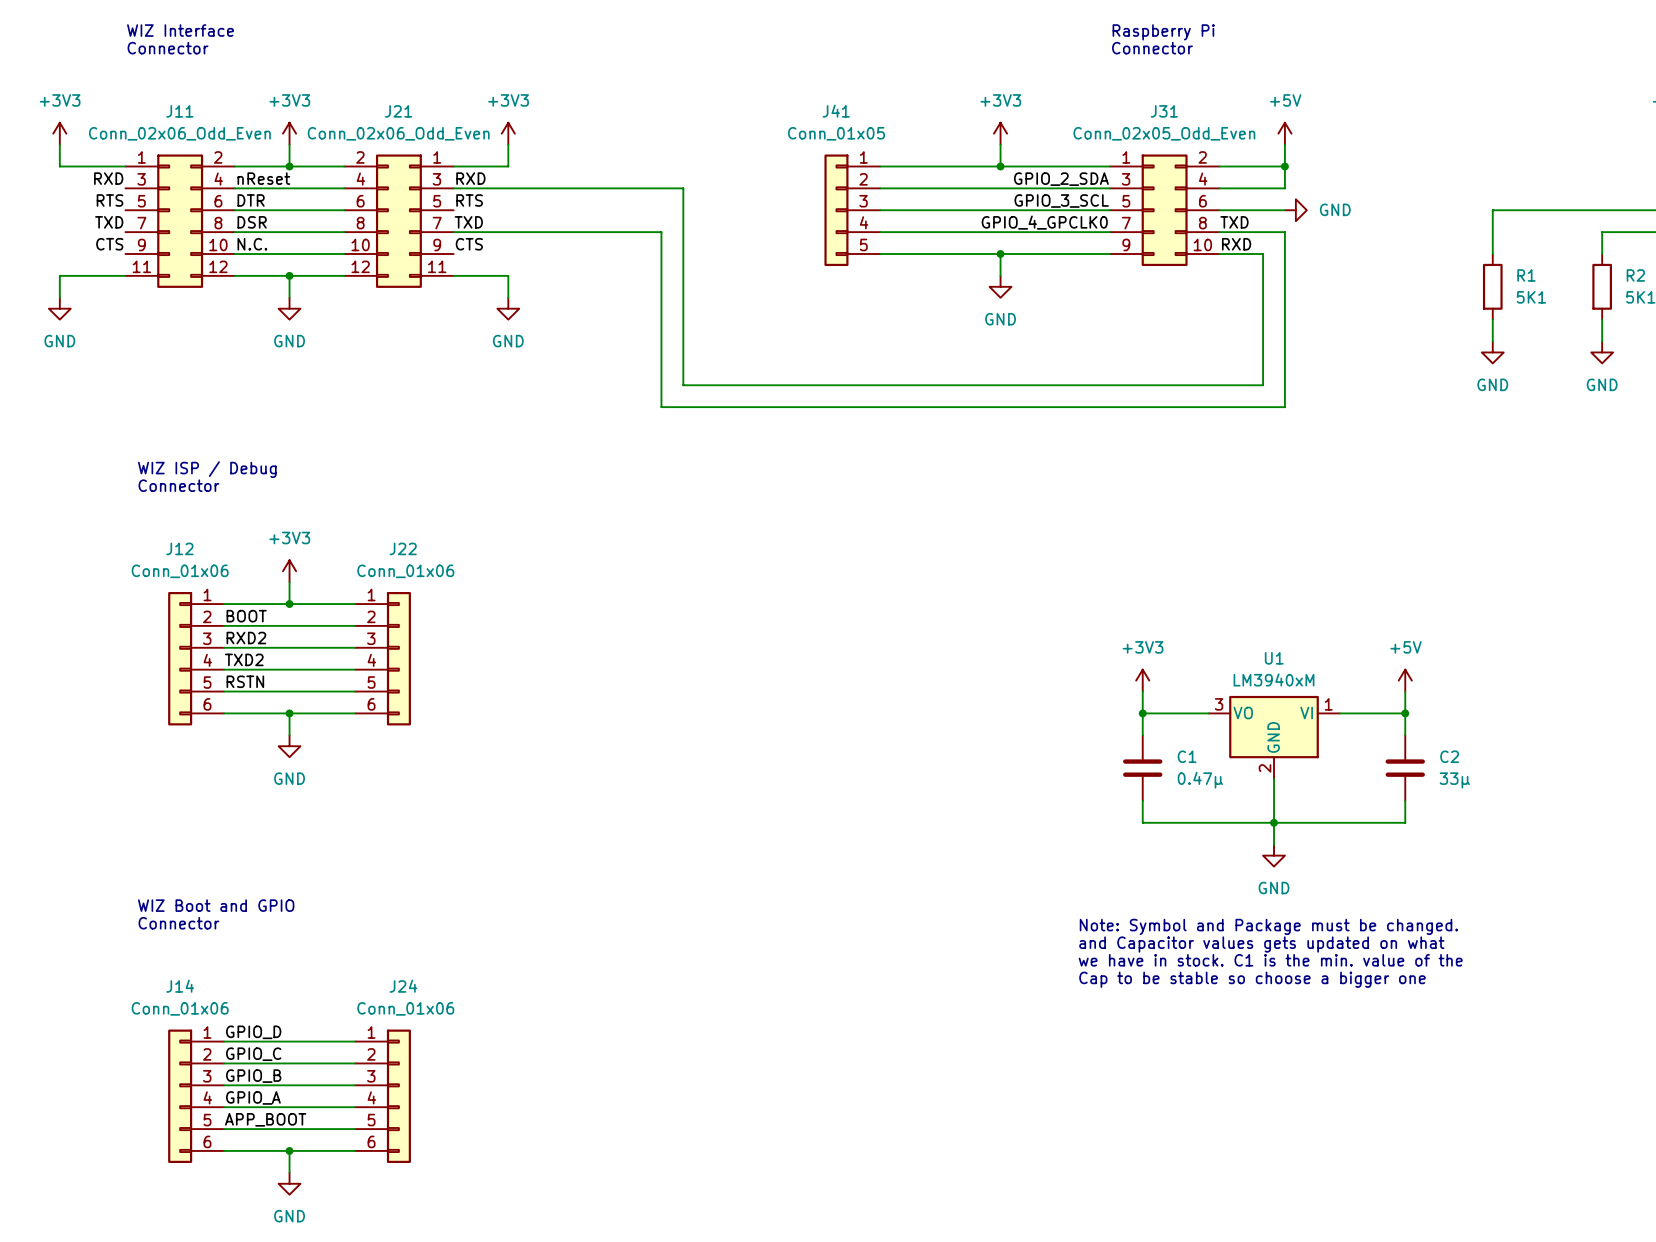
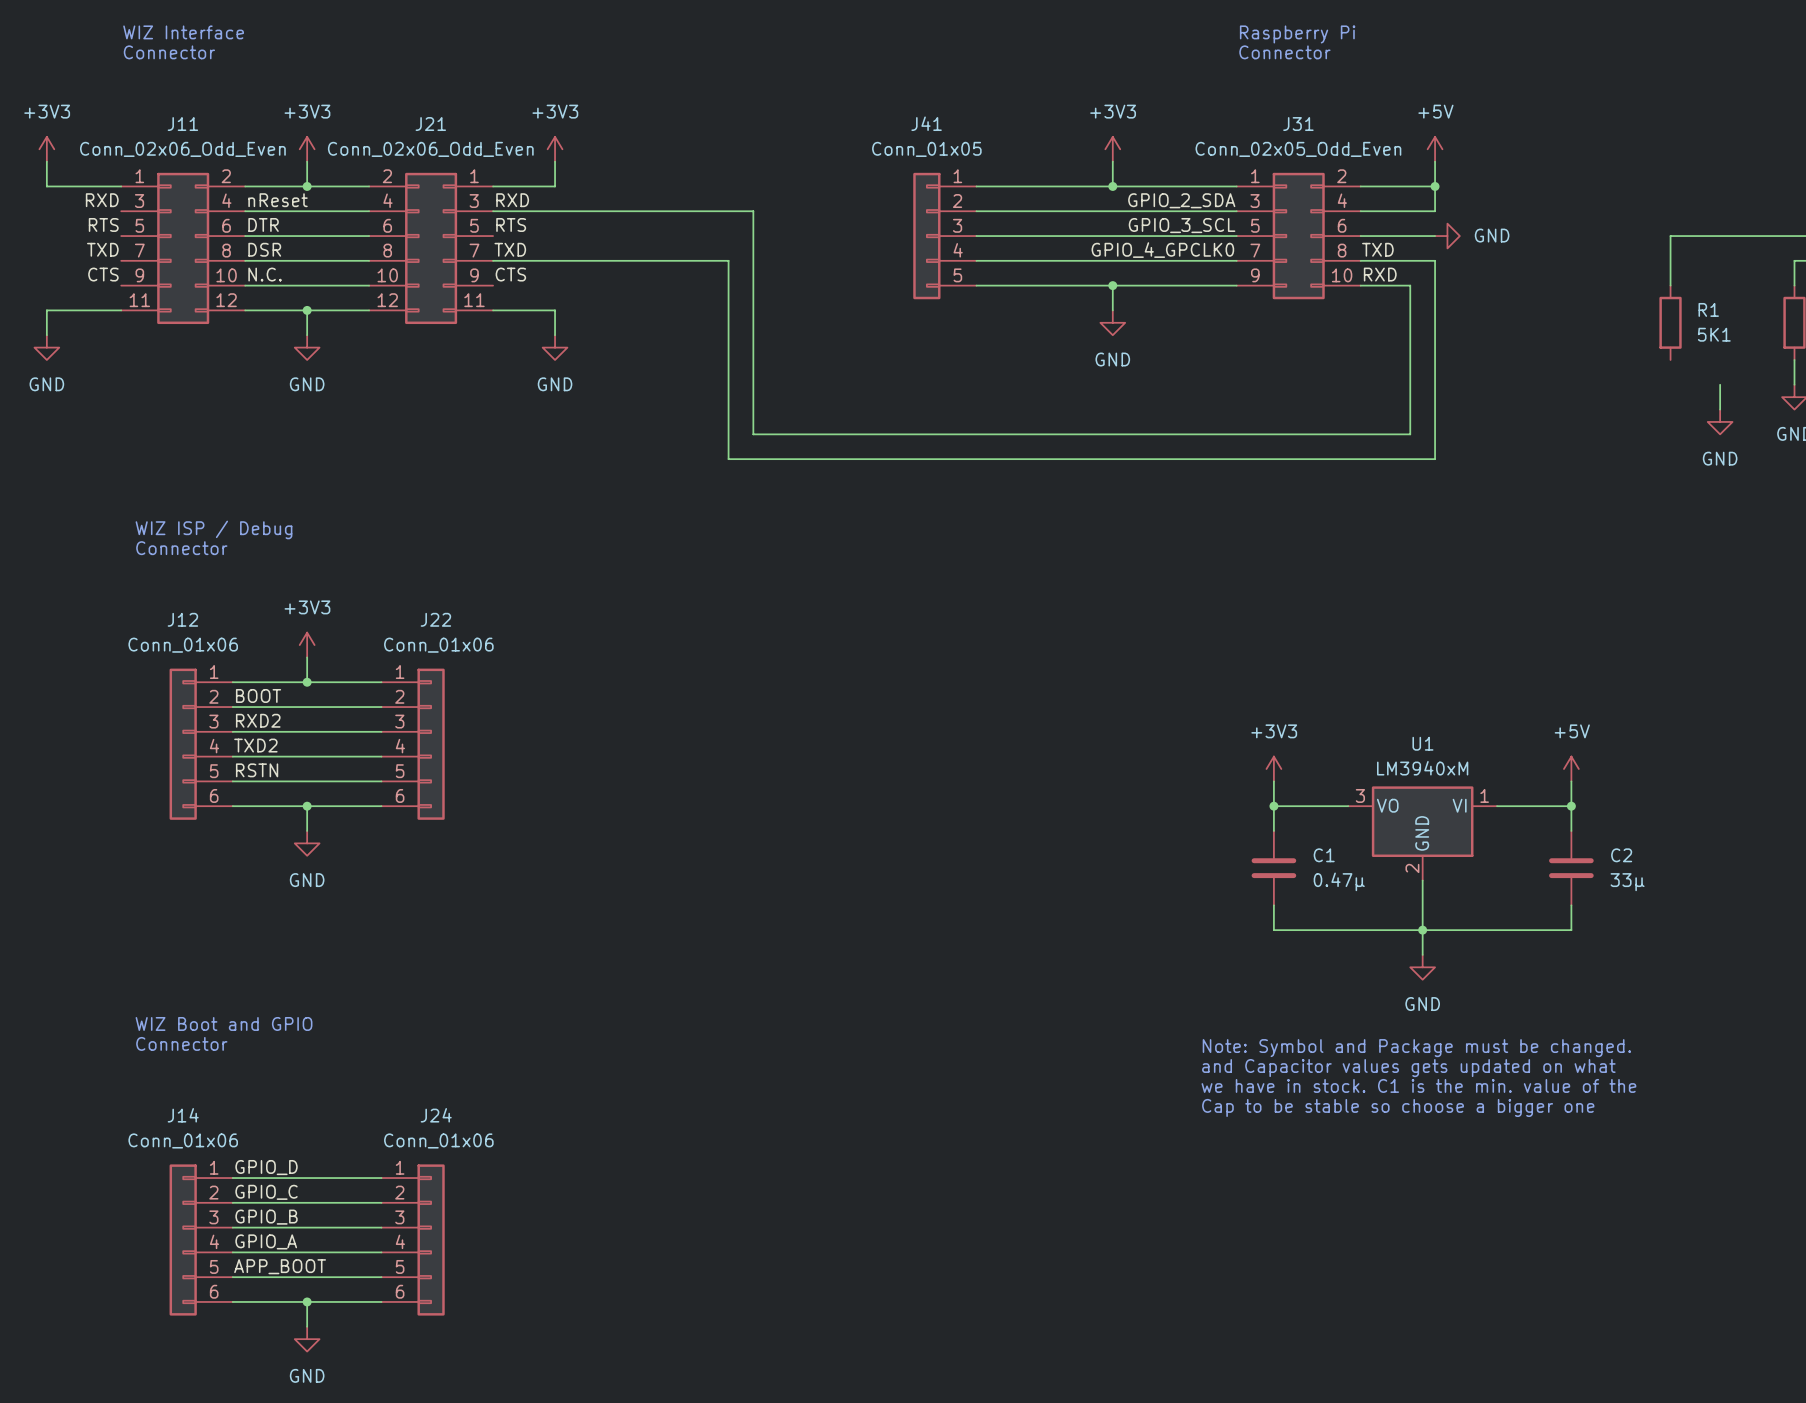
wire: (1492, 319) (1492, 341) -> (1720, 384) (1720, 409)
power symbol position: GND (1492, 352) -> GND (1720, 421)

